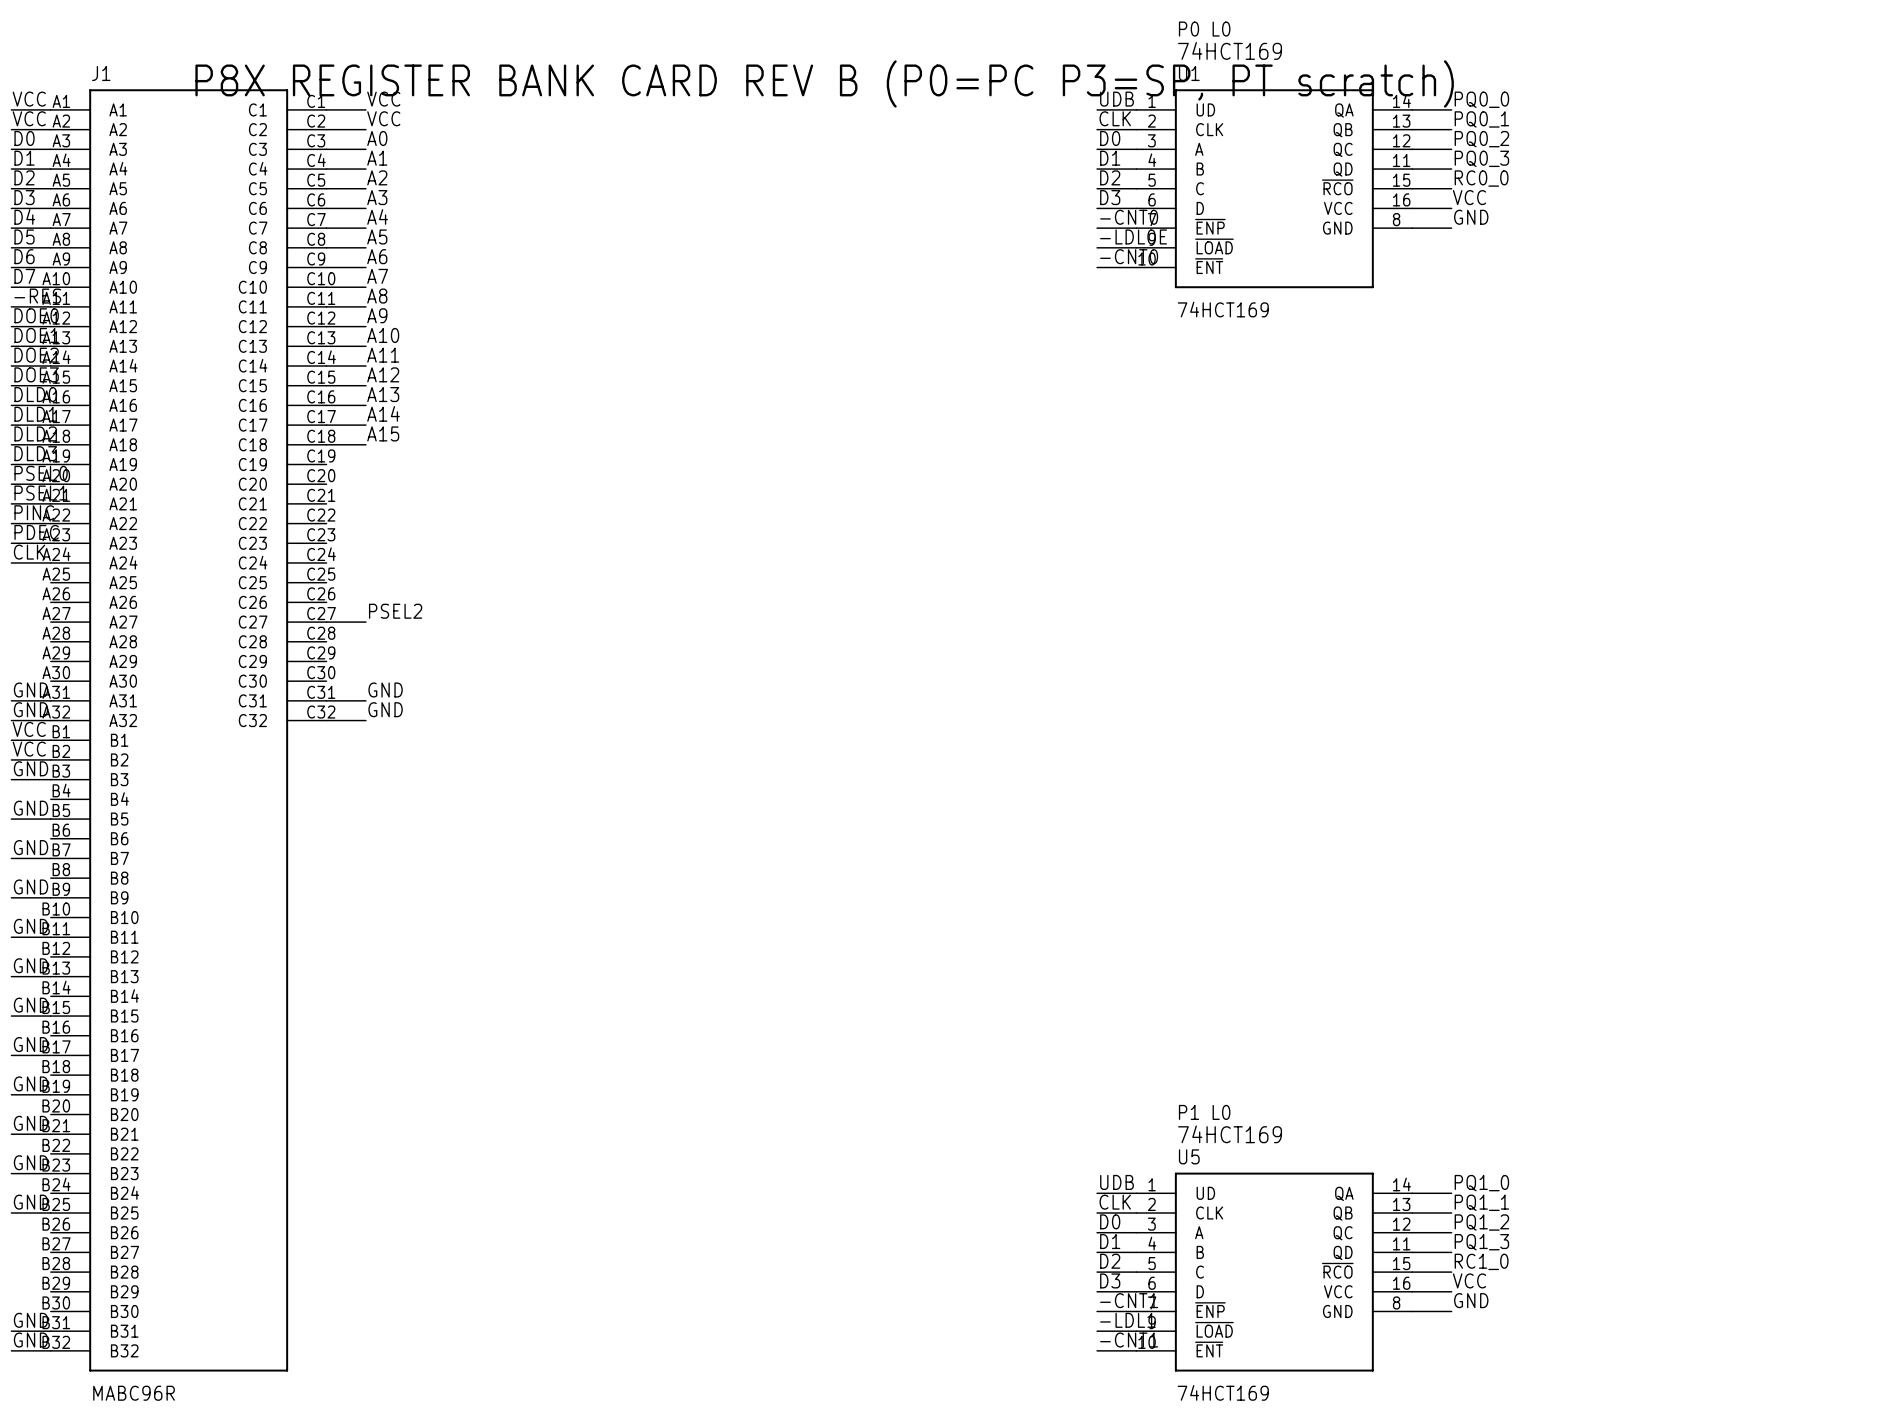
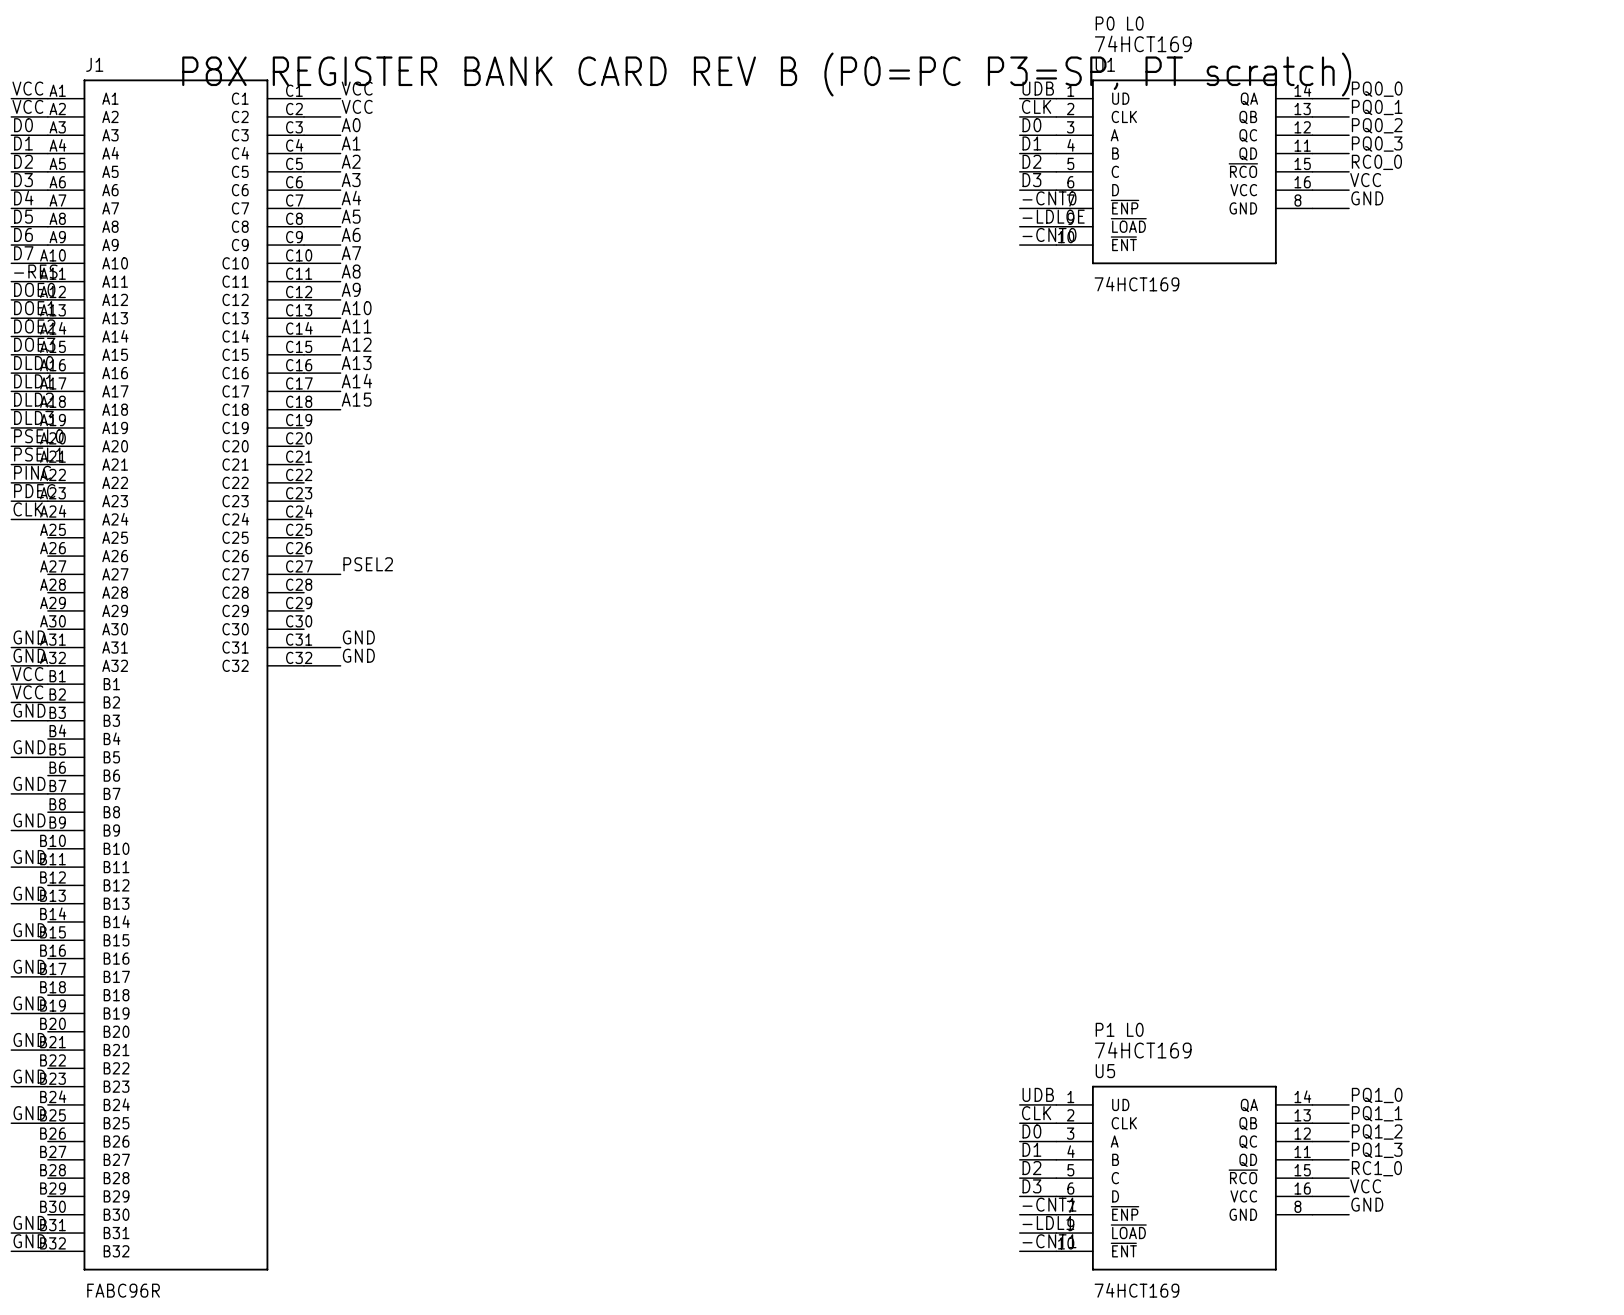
J1 value: MABC96R (134, 1393) -> FABC96R (123, 1290)

